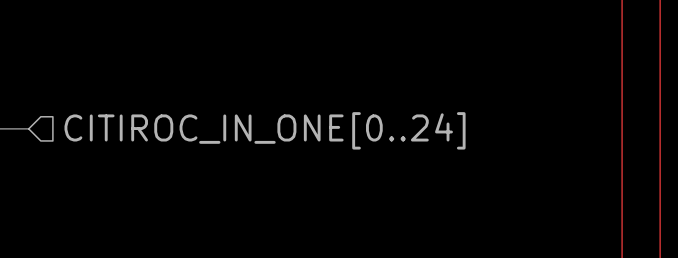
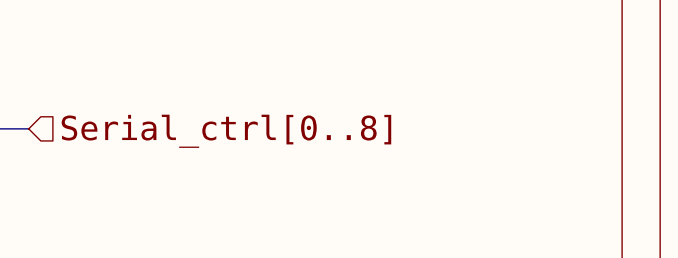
hierarchical label: CITIROC_IN_ONE[0..24] (265, 130) -> Serial_ctrl[0..8] (226, 131)

